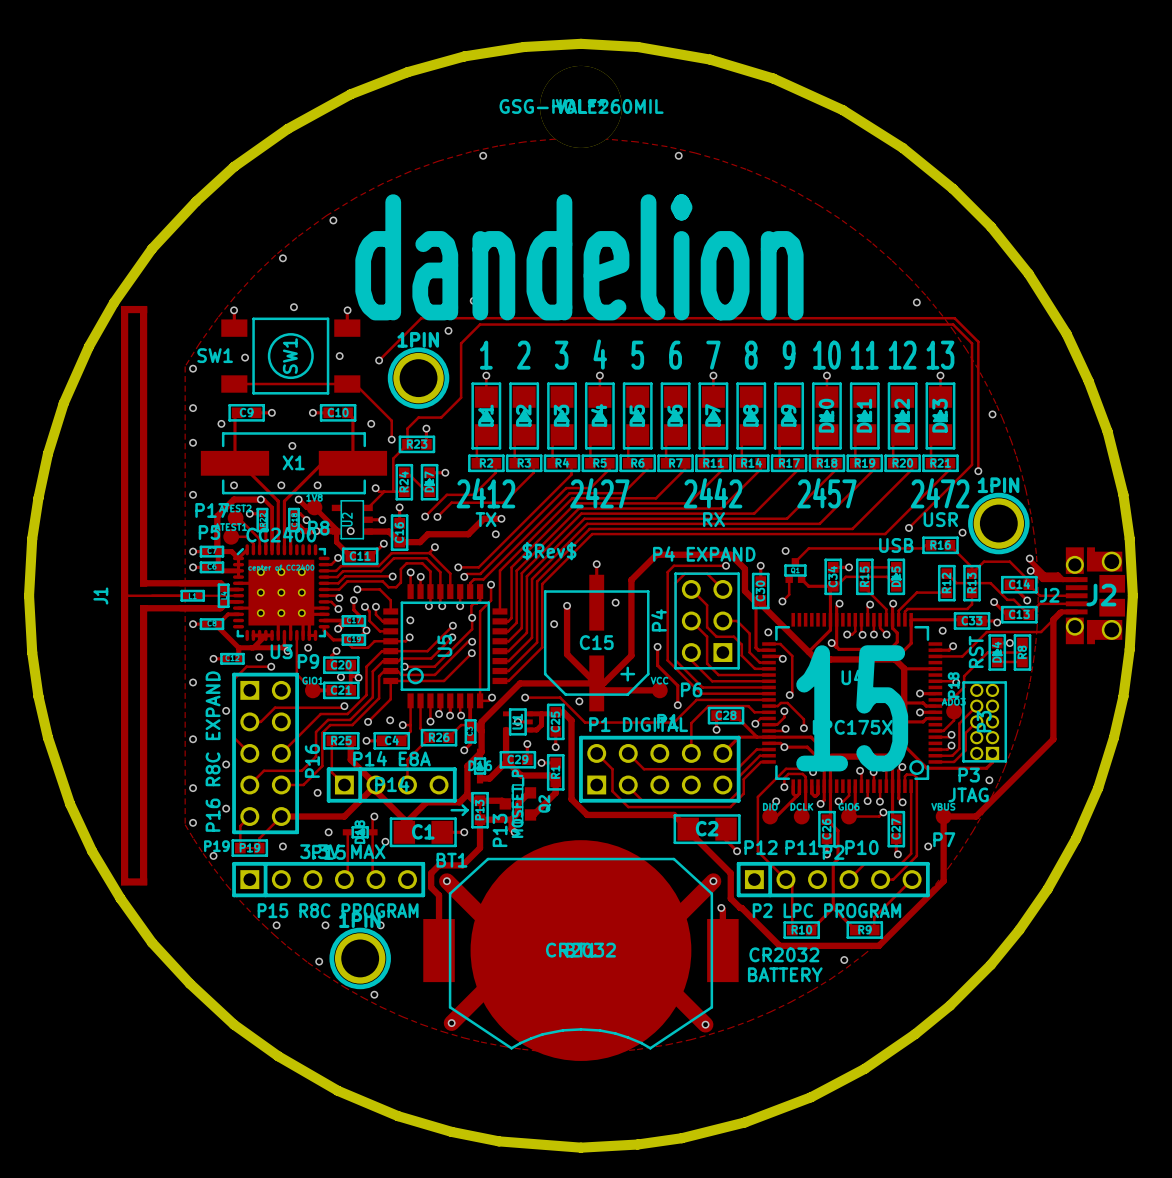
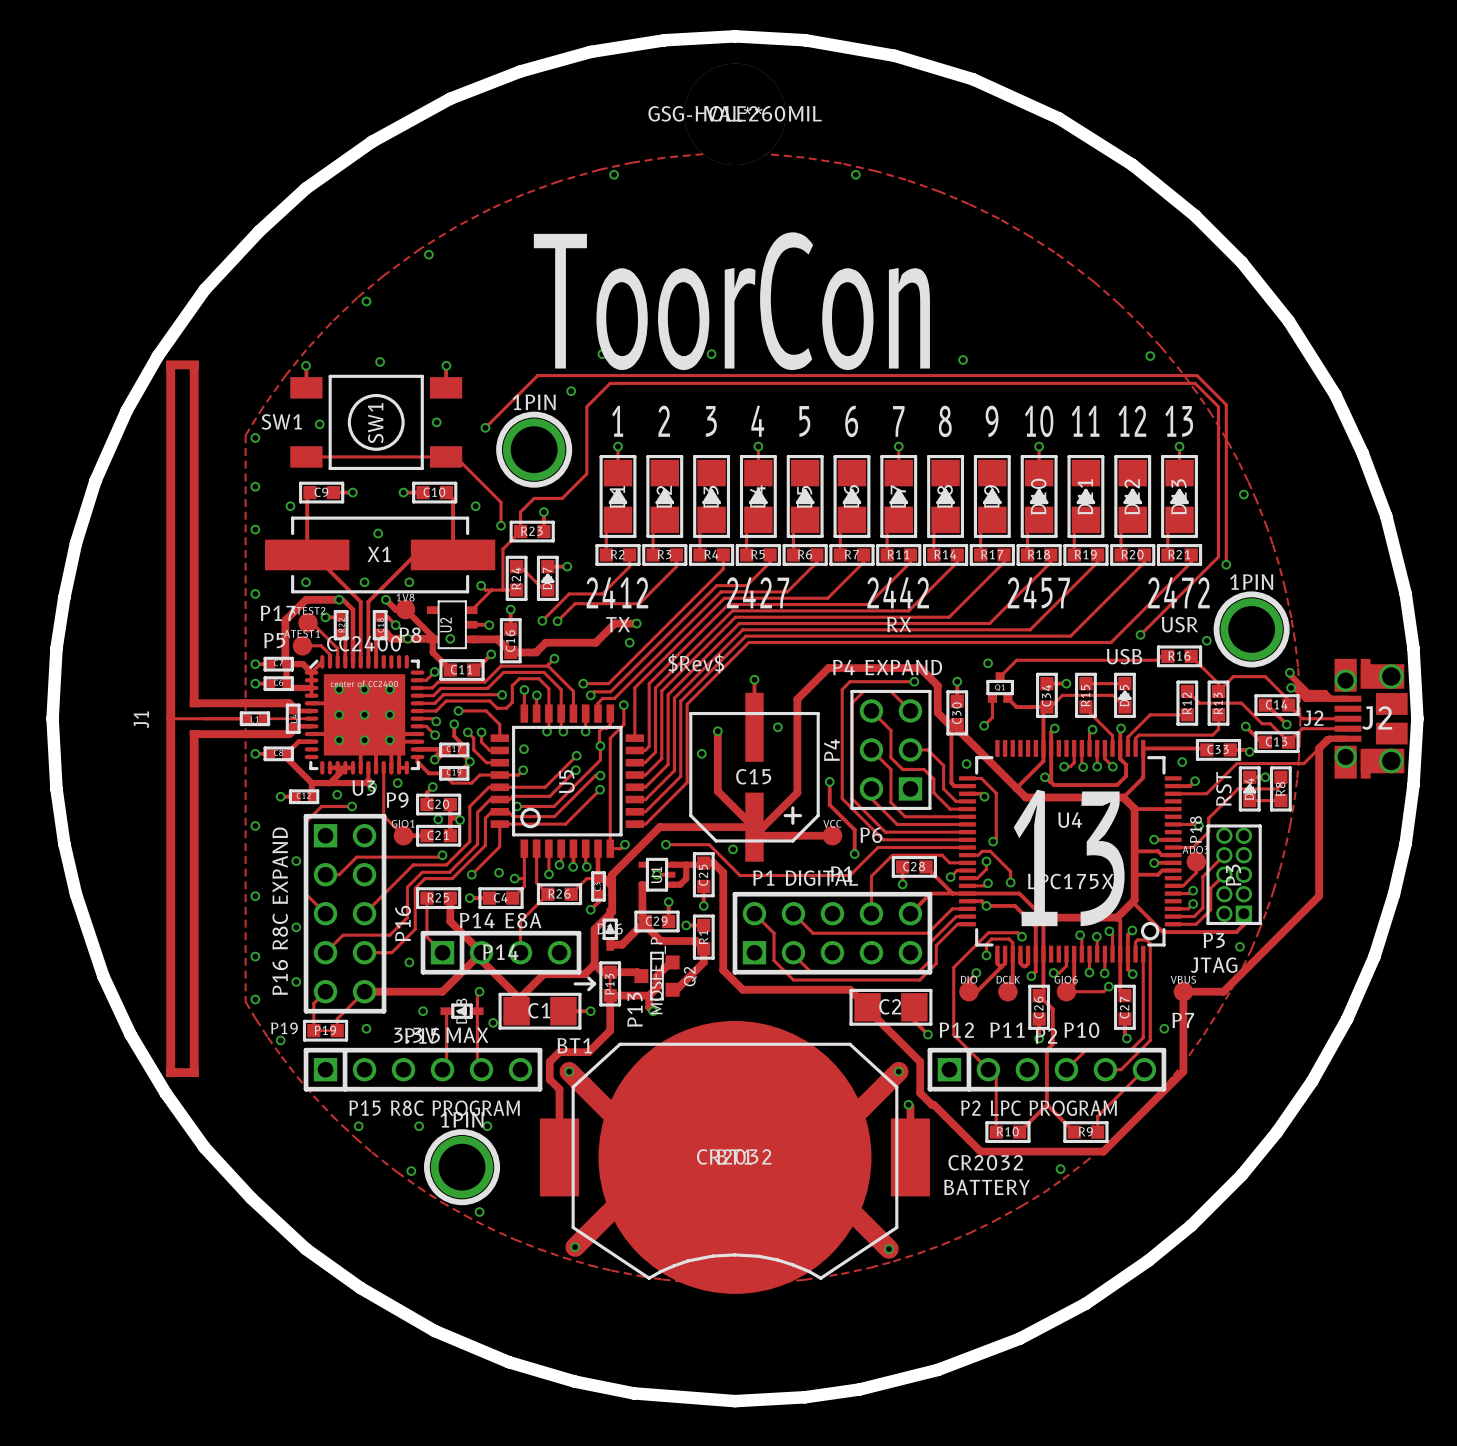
text: dandelion (579, 257) -> ToorCon (731, 301)
text: 15 (852, 708) -> 13 (1069, 857)

